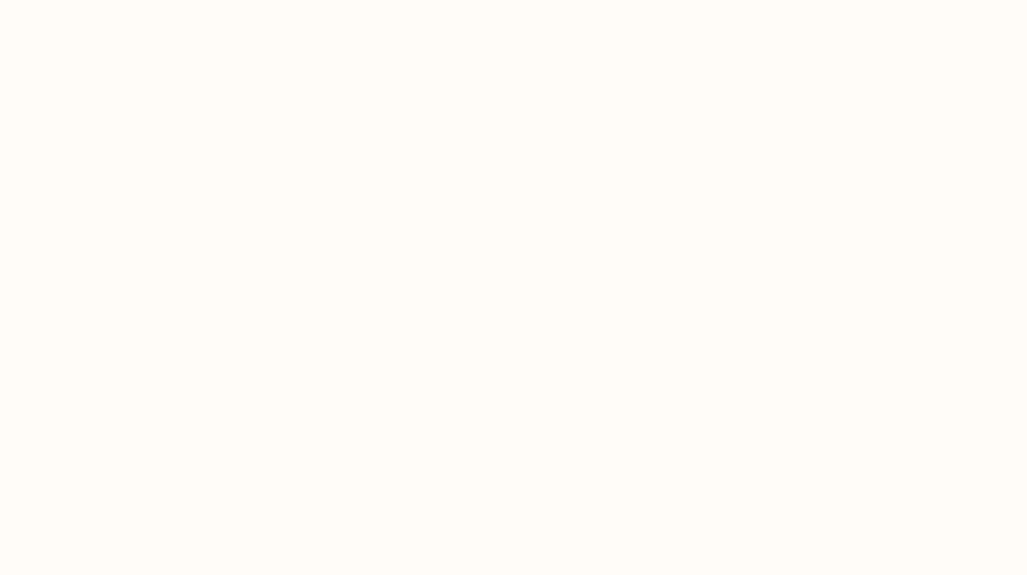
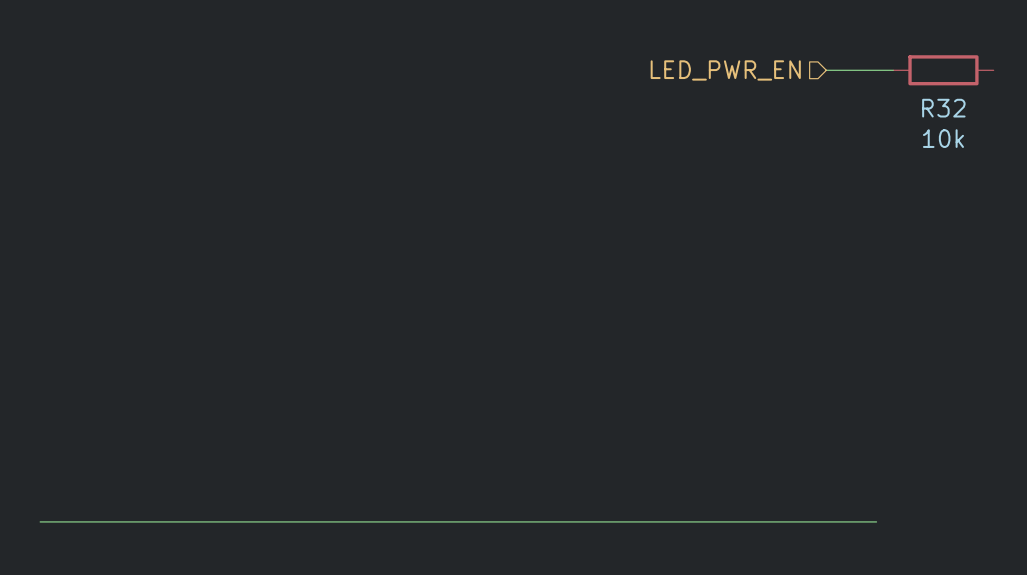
hierarchical label: none -> LED_PWR_EN (725, 70)
wire: none -> (826, 70) (893, 70)
R32: none -> 10k (943, 70)
wire: none -> (40, 521) (876, 521)

